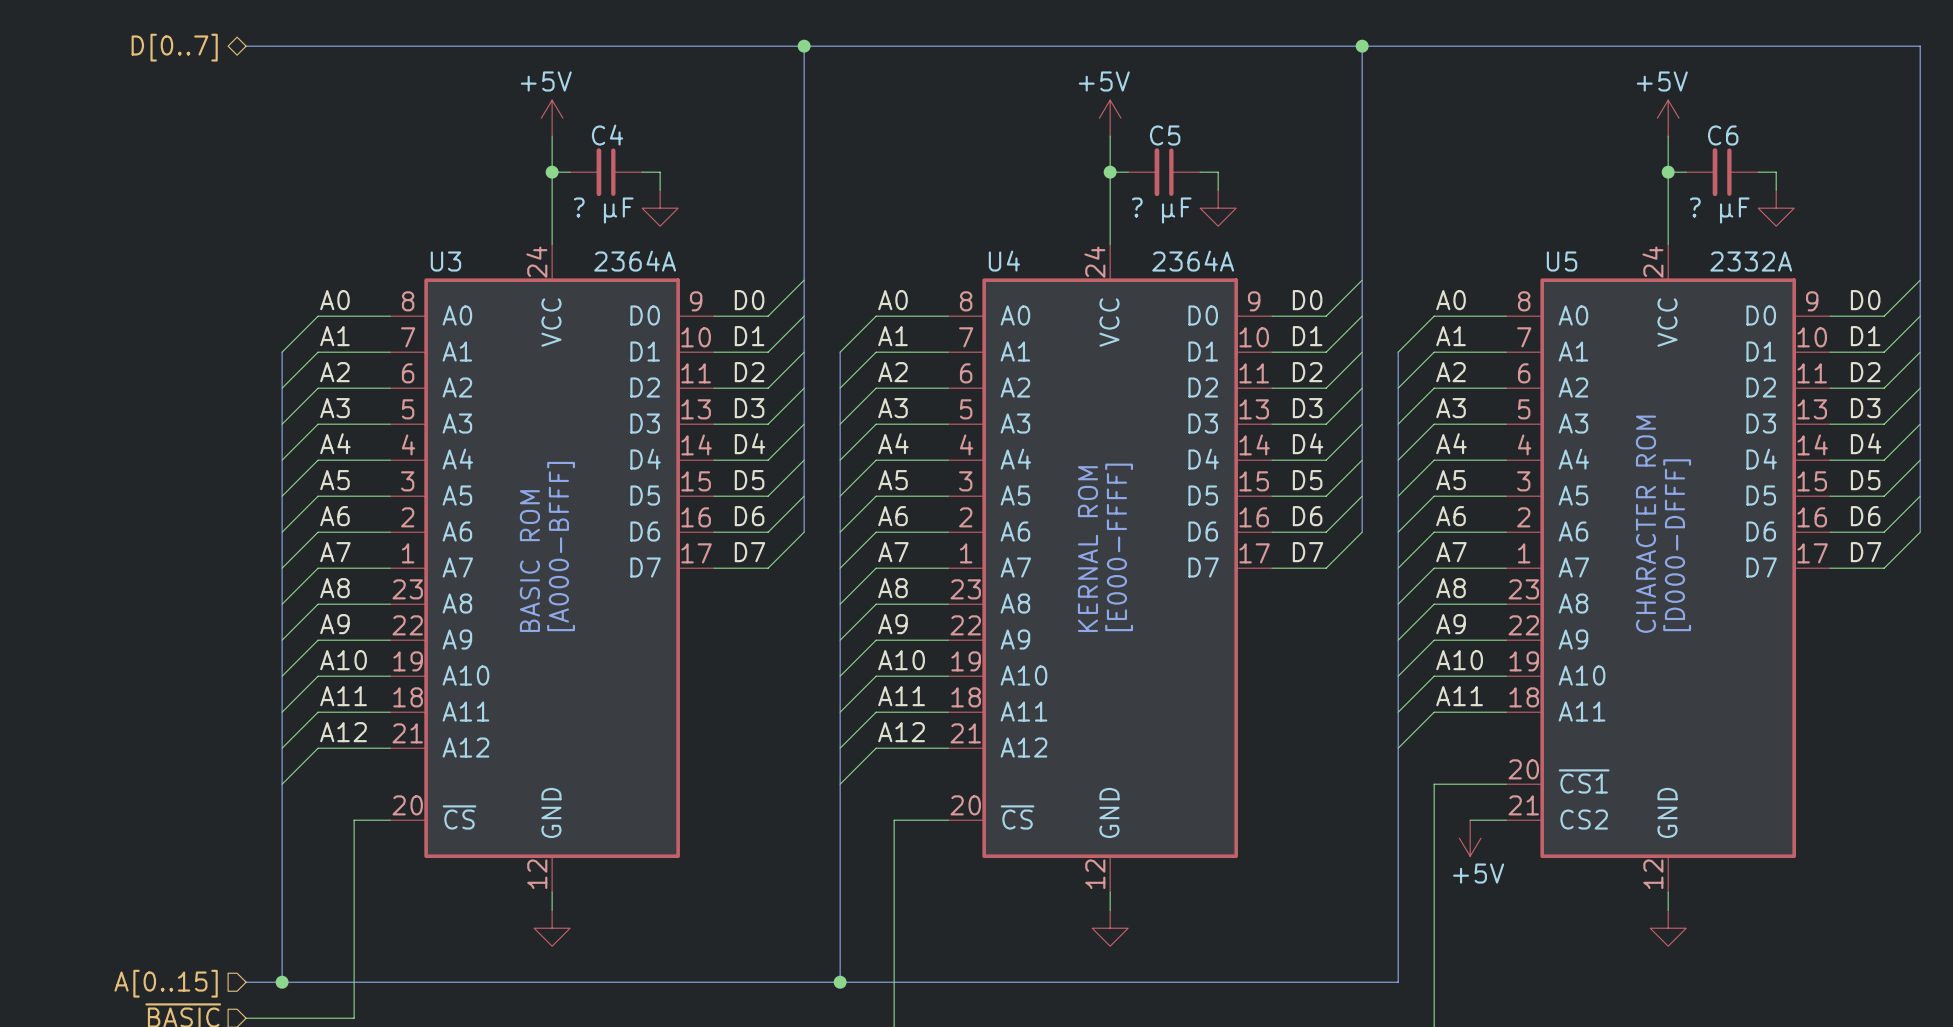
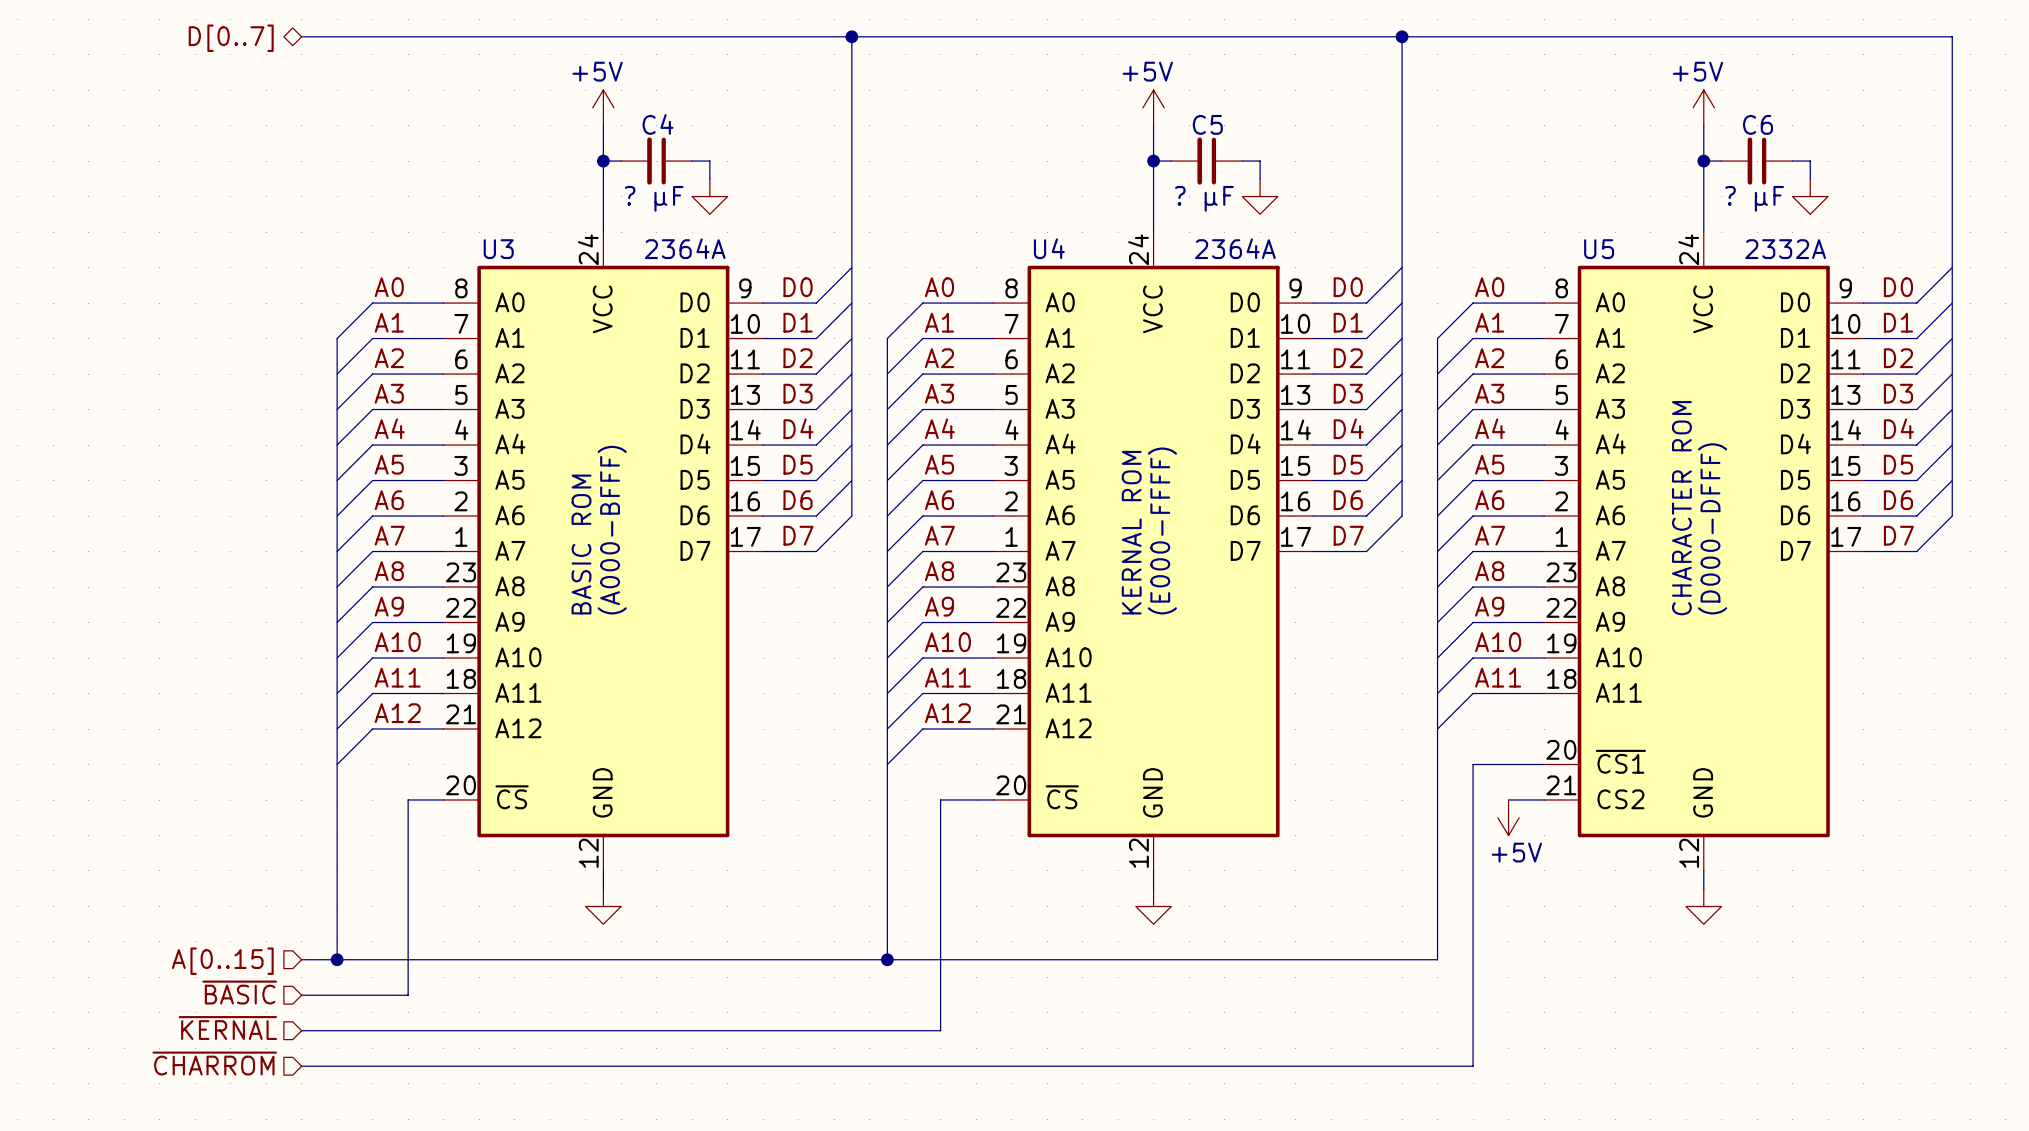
text: [D000-DFFF] (1677, 545) -> (D000-DFFF) (1712, 528)
text: [A000-BFFF] (561, 546) -> (A000-BFFF) (612, 530)
text: [E000-FFFF] (1119, 547) -> (E000-FFFF) (1162, 530)

